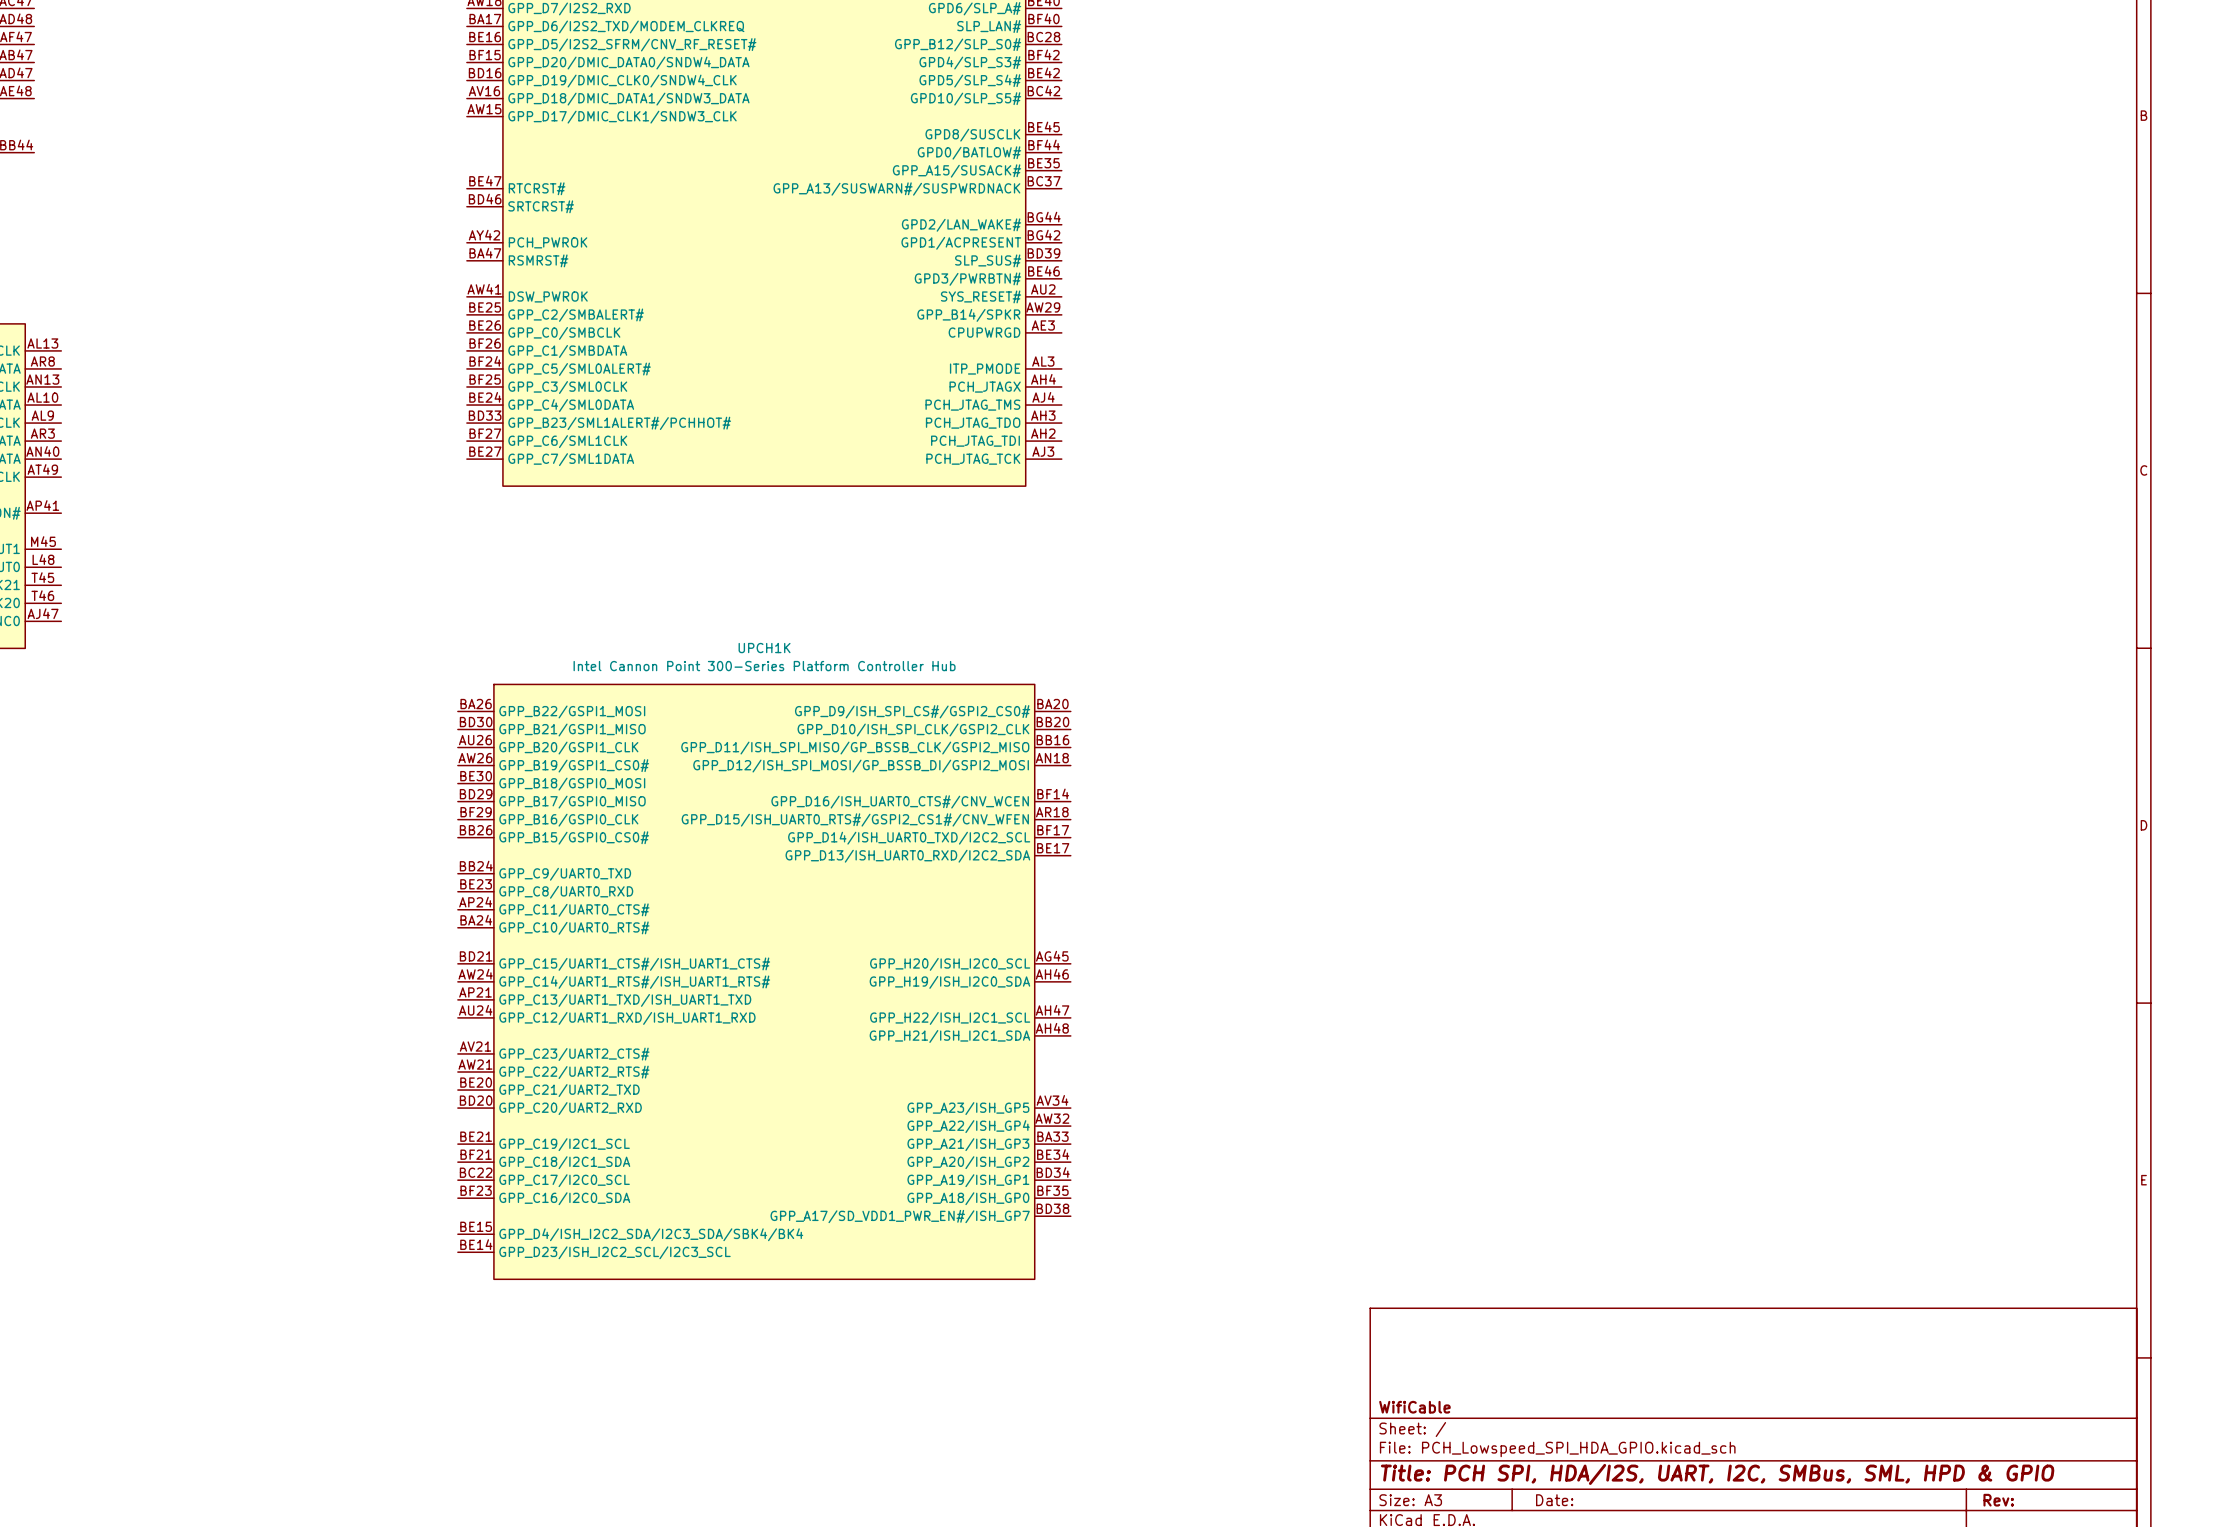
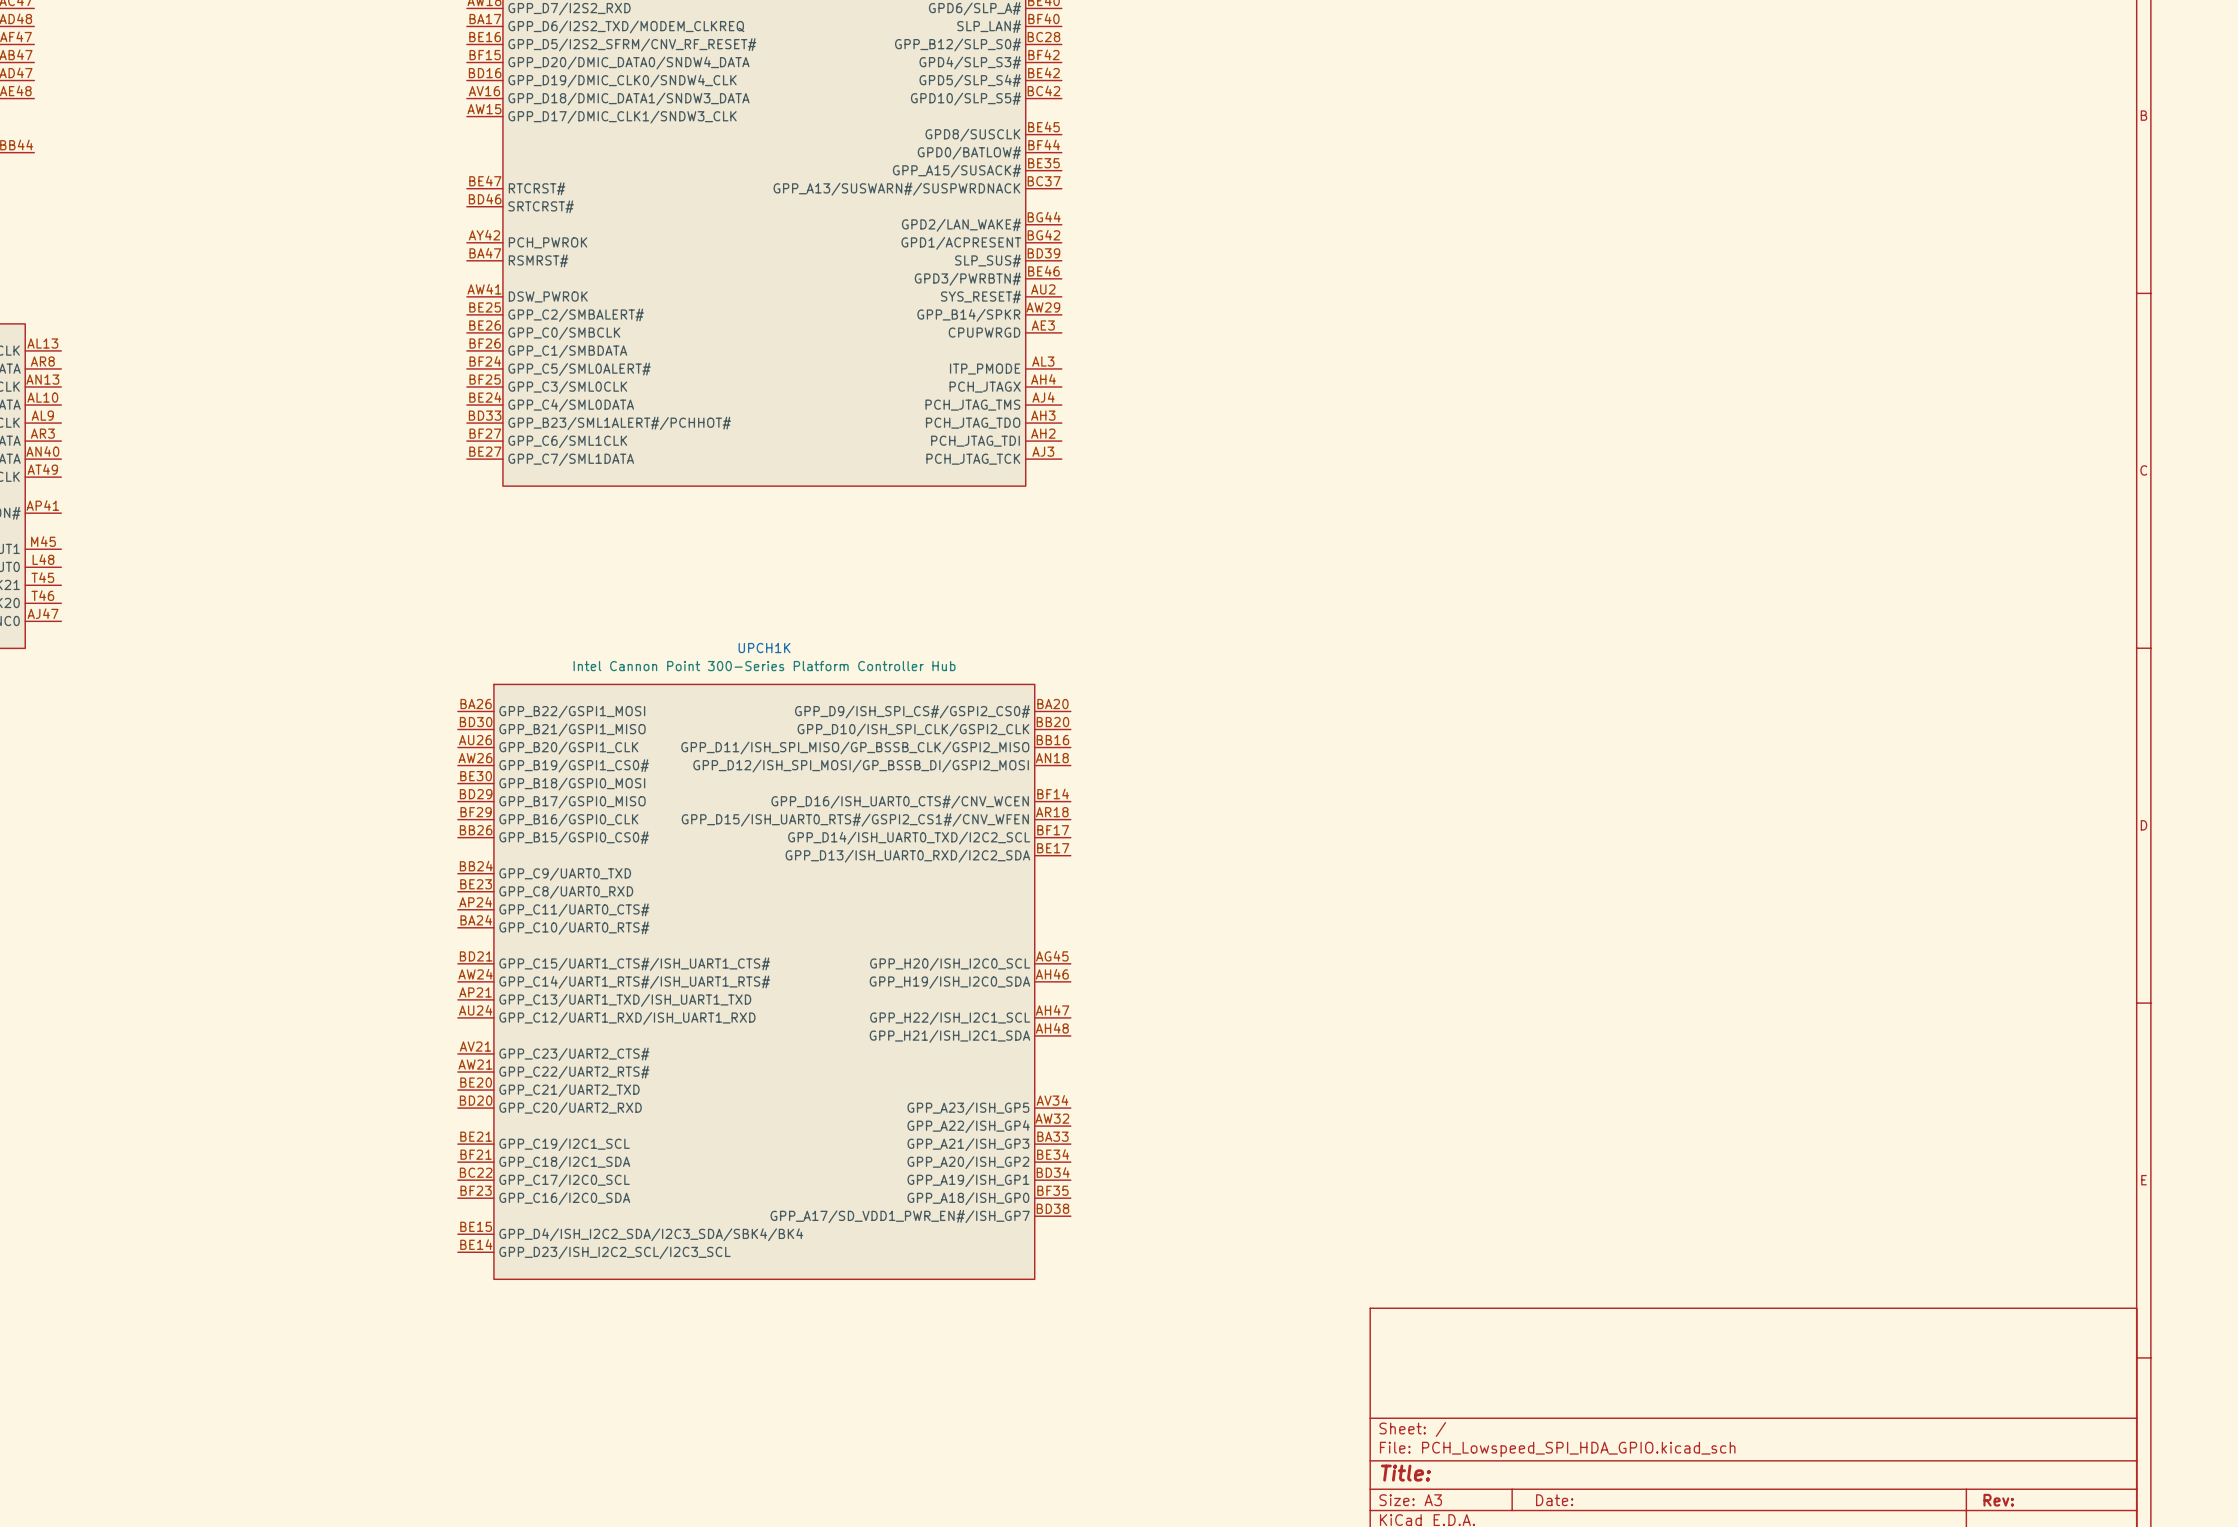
title block: WifiCable (1414, 1407) -> none
title block: Title: PCH SPI, HDA/I2S, UART, I2C, SMBus, SML, HPD & GPIO (1717, 1474) -> Title: (1405, 1473)

